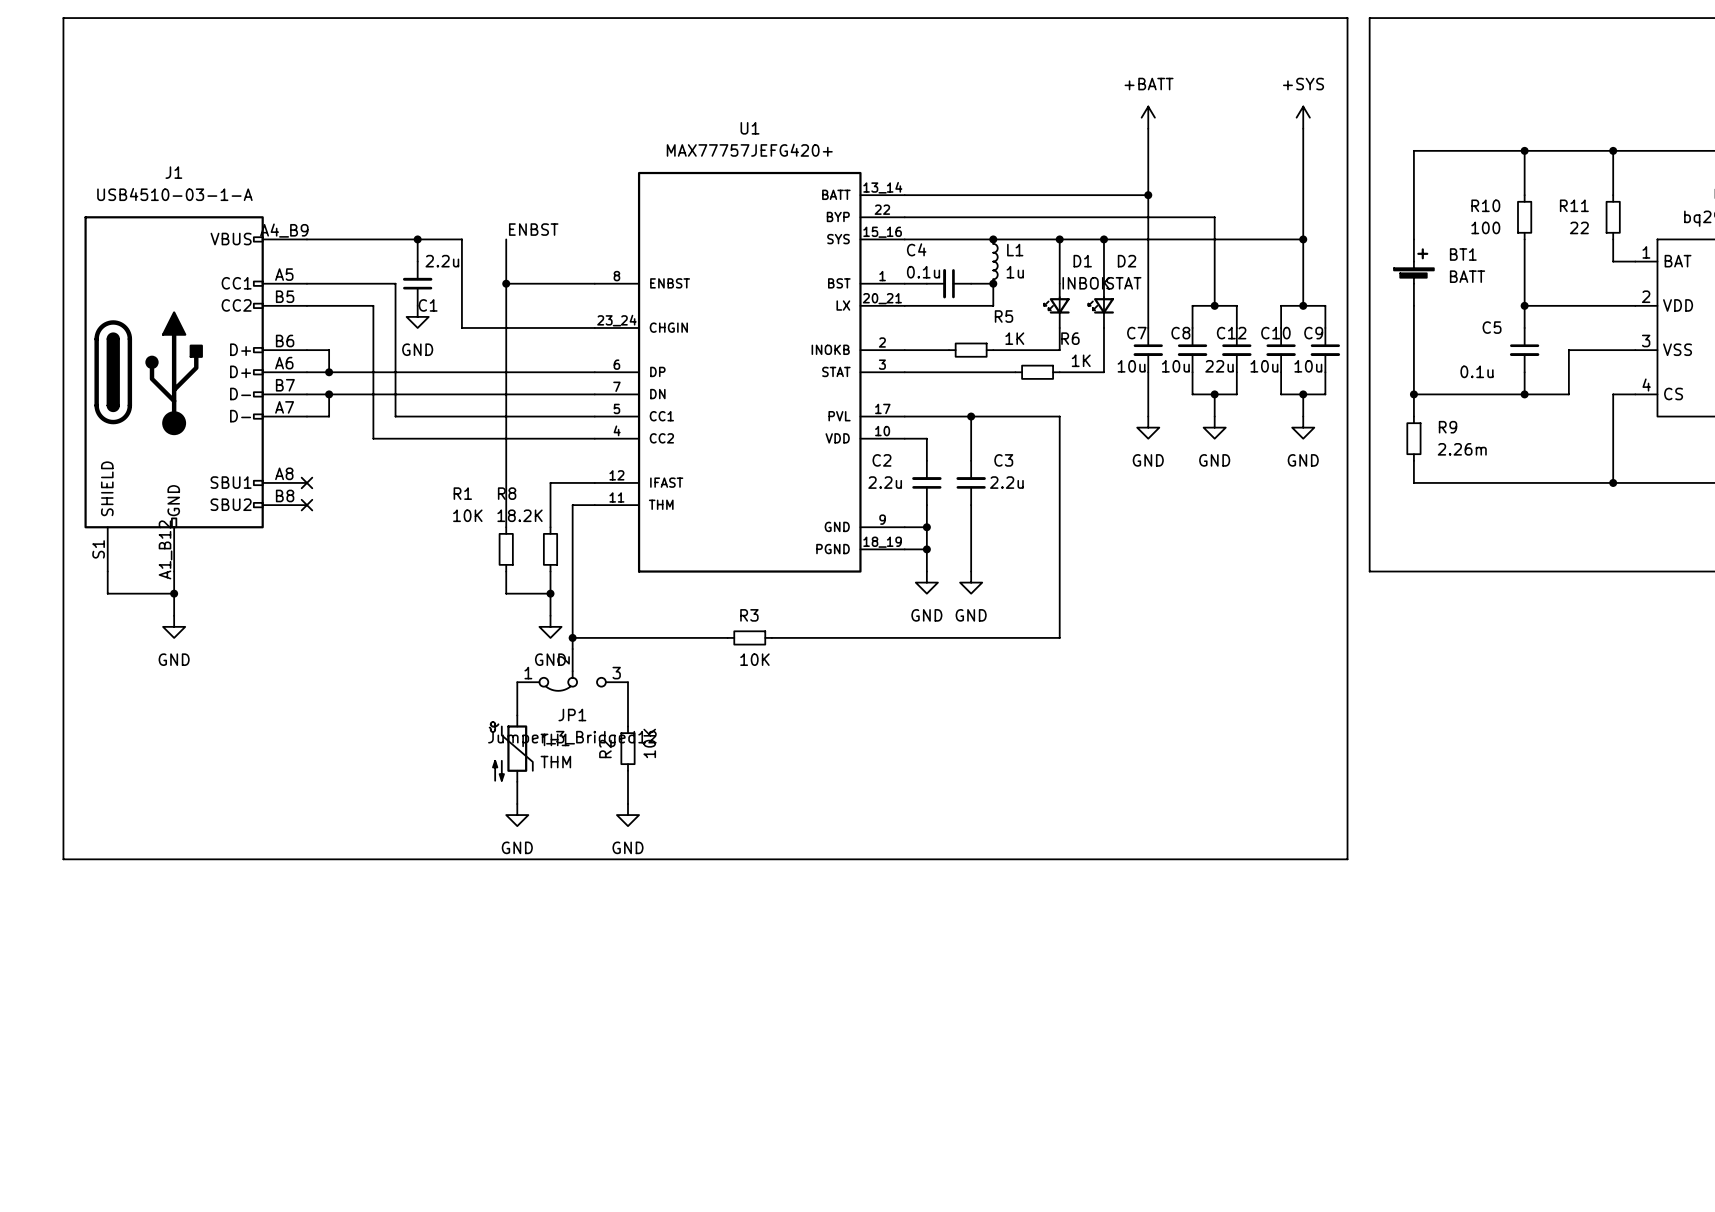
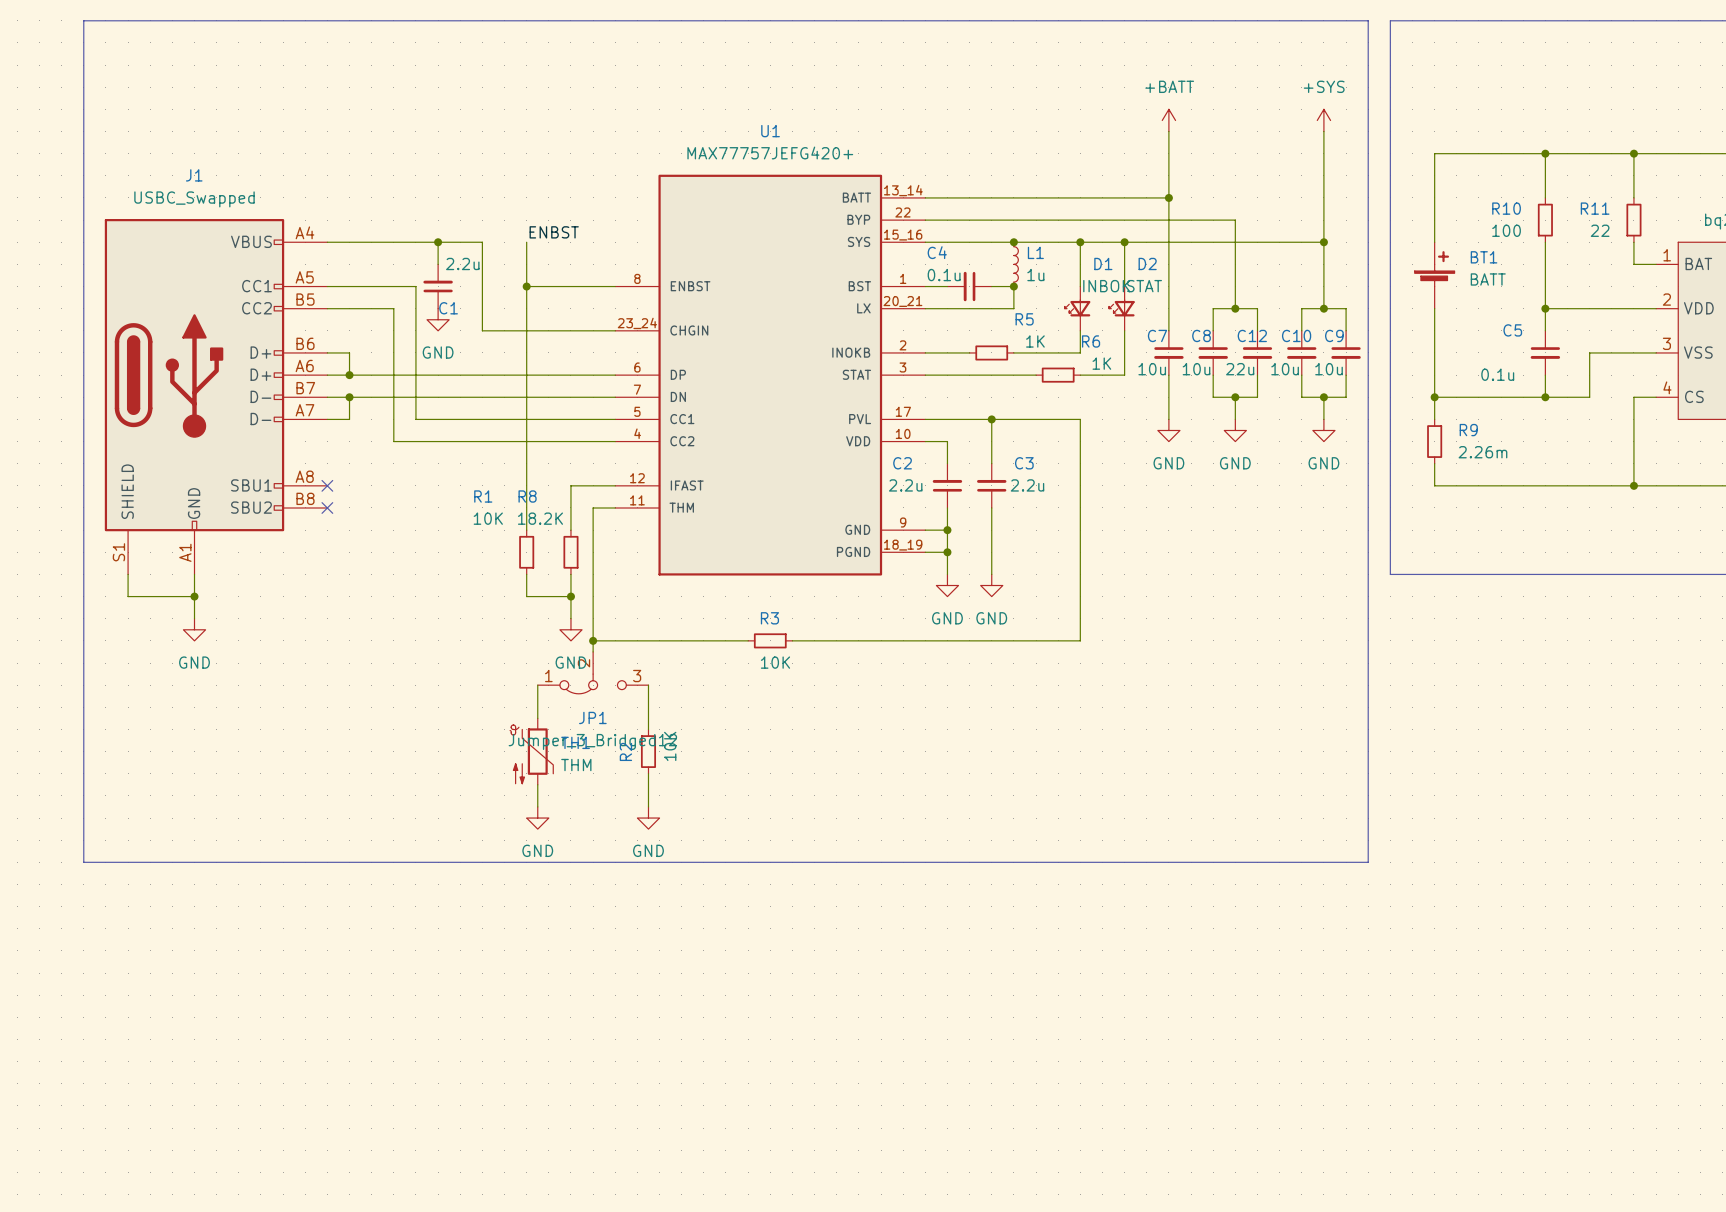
J1 value: USB4510-03-1-A (174, 194) -> USBC_Swapped (194, 199)
J1 pin number: A4_B9 (284, 230) -> A4 (304, 232)
J1 pin number: A1_B12 (165, 549) -> A1 (185, 552)

